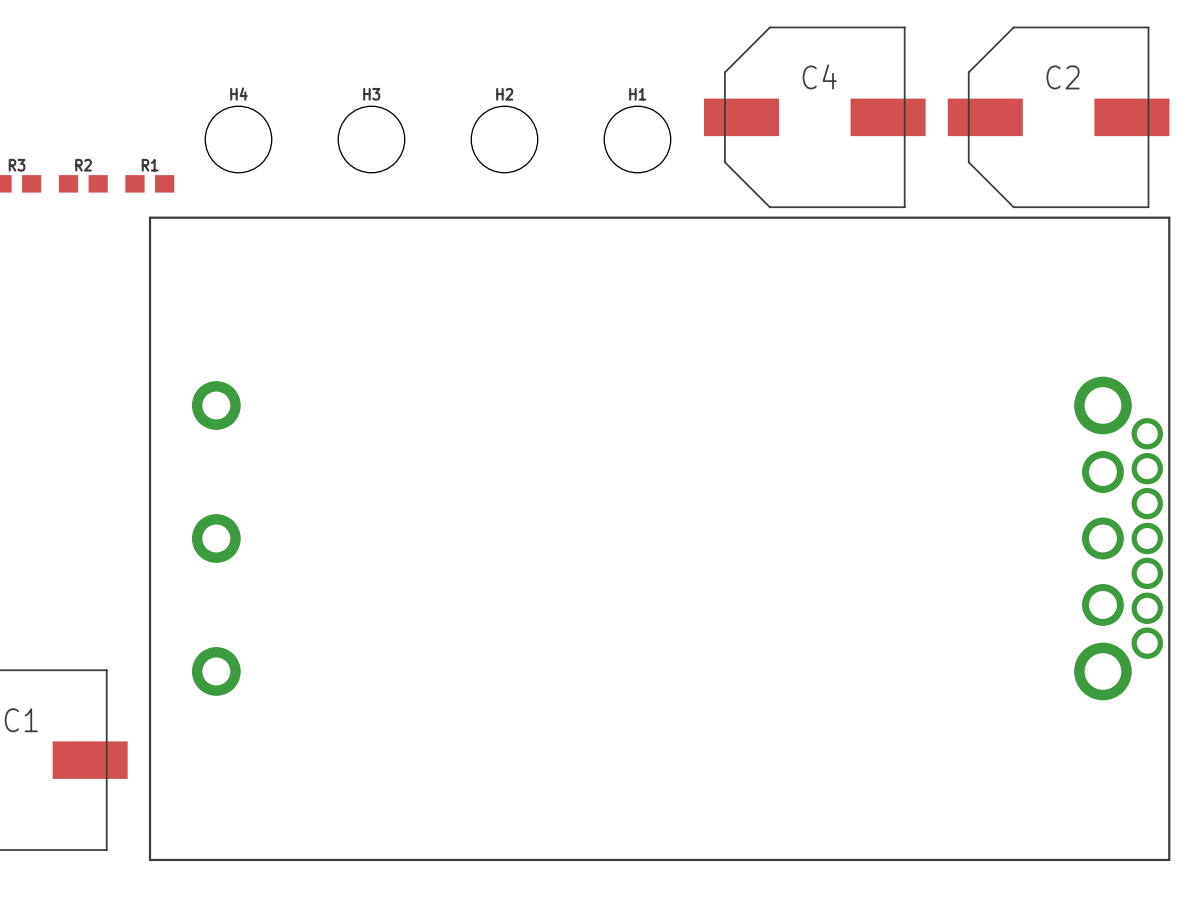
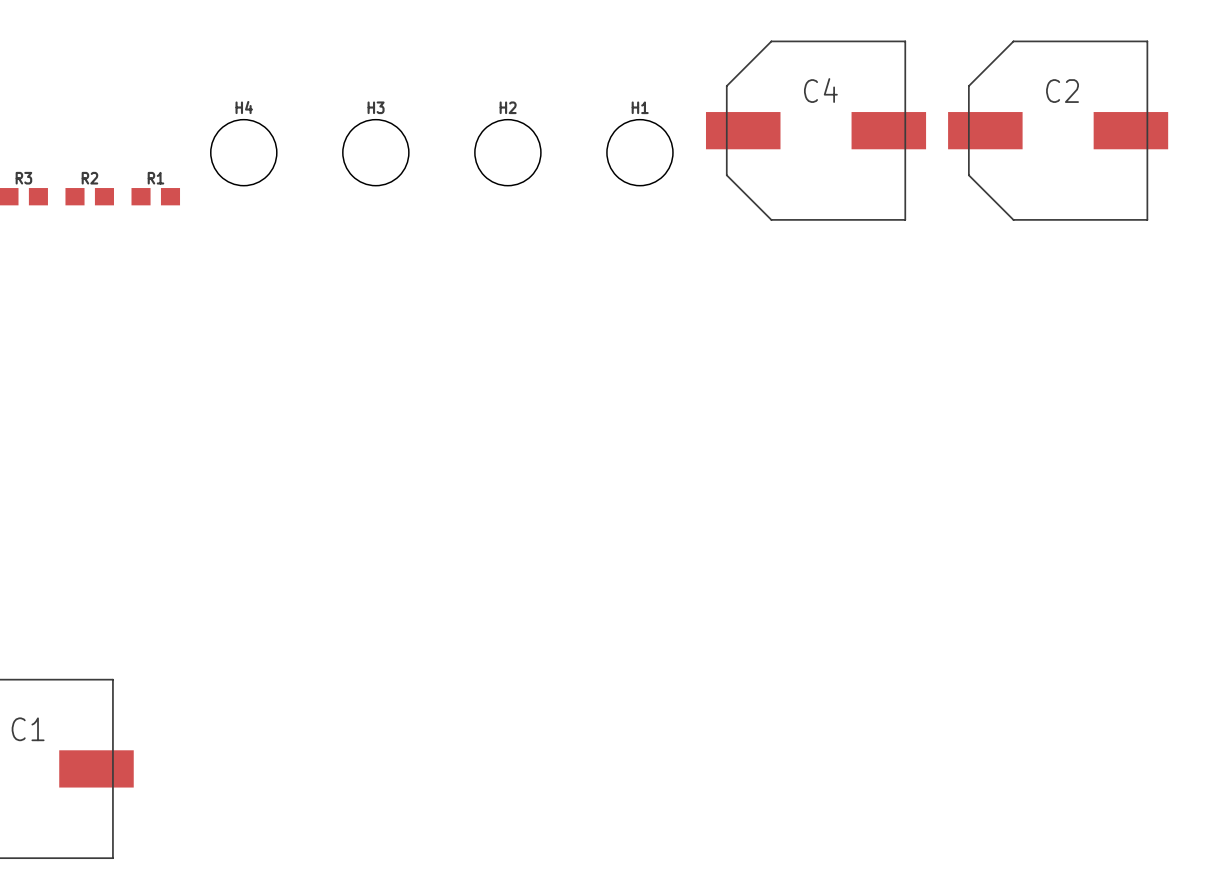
part: (659, 538) -> none

